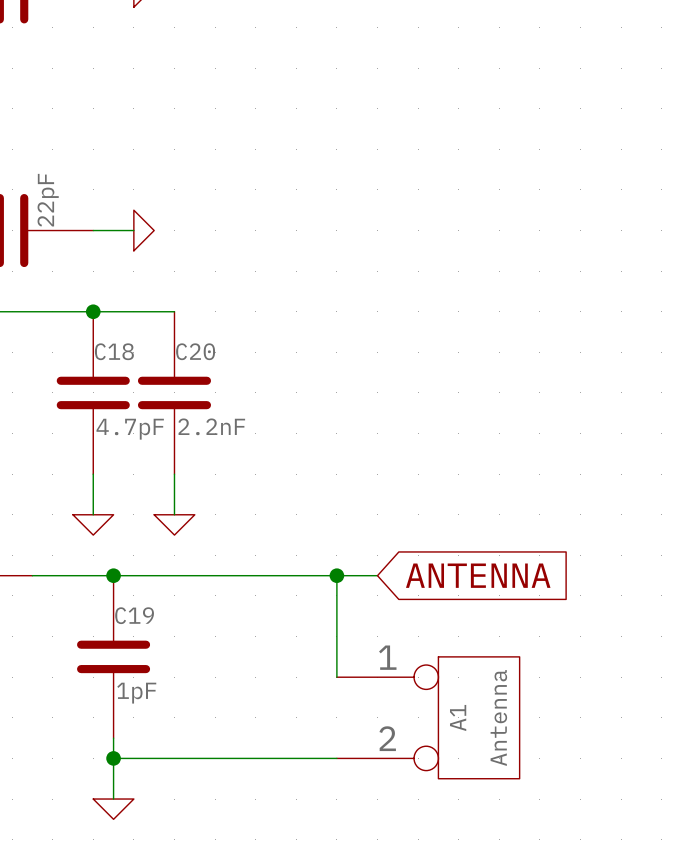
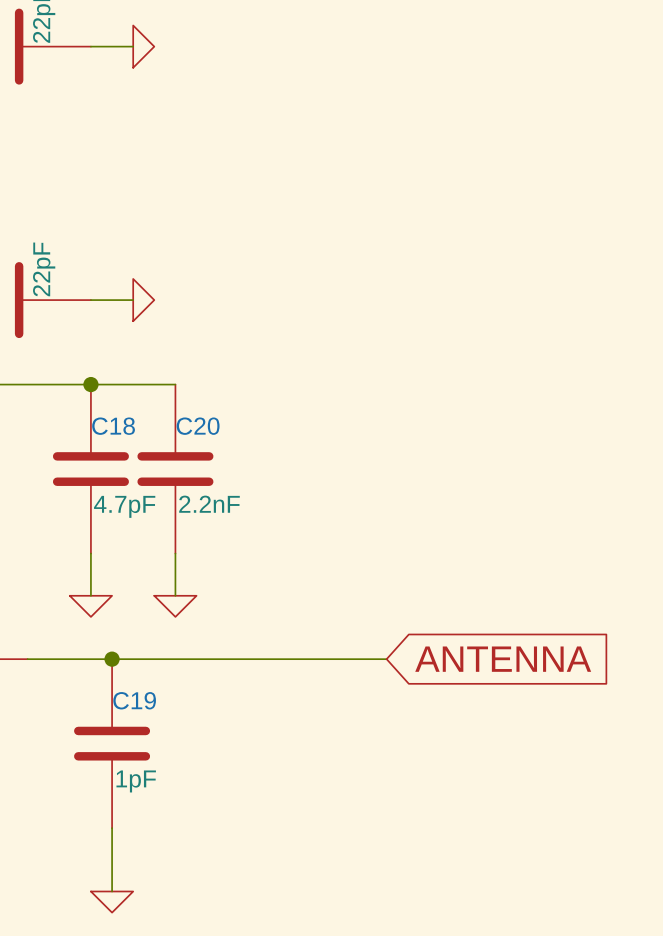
wire: (336, 575) (336, 677) -> none
junction: (336, 575) -> none
A1: Antenna (428, 717) -> none
wire: (113, 758) (336, 758) -> none
junction: (113, 758) -> none

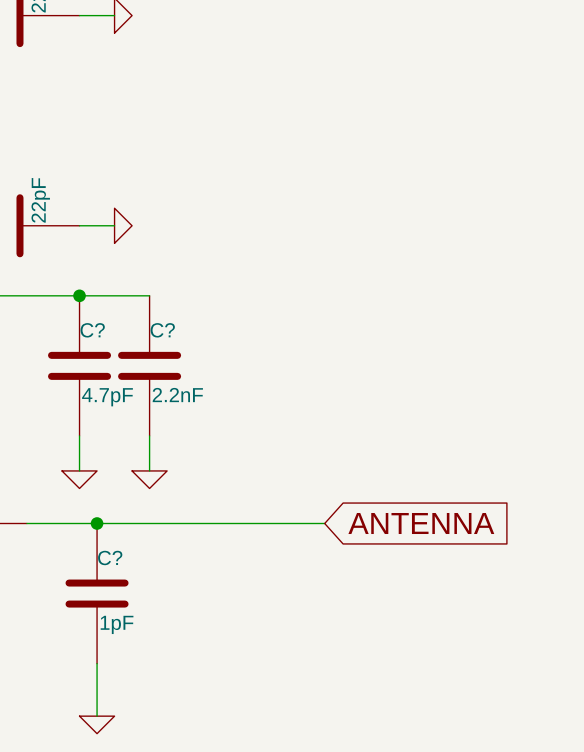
C18 name: C18 (113, 426) -> C? (92, 330)
C20 name: C20 (198, 426) -> C? (162, 330)
C19 name: C19 (134, 700) -> C? (110, 558)

